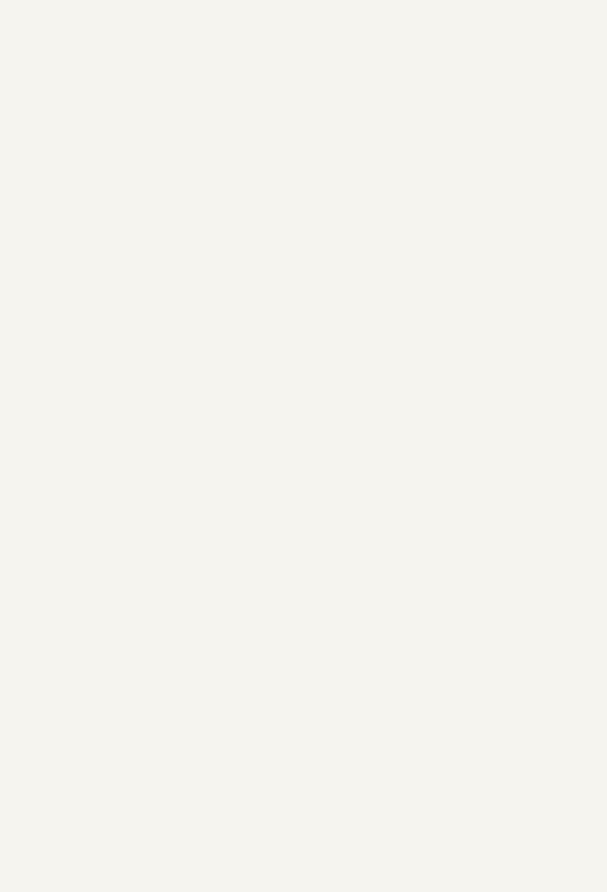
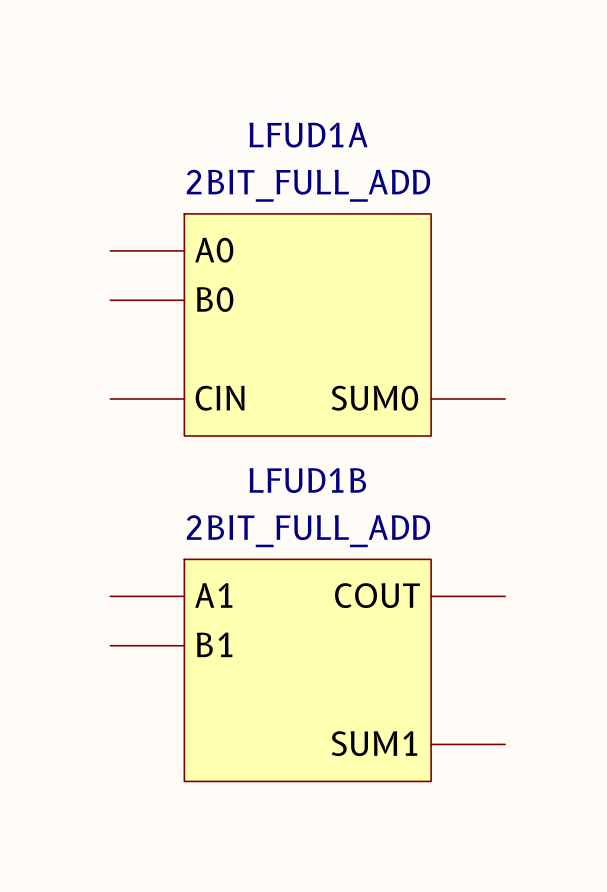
LFUD1A: none -> 2BIT_FULL_ADD (307, 324)
LFUD1B: none -> 2BIT_FULL_ADD (307, 670)

